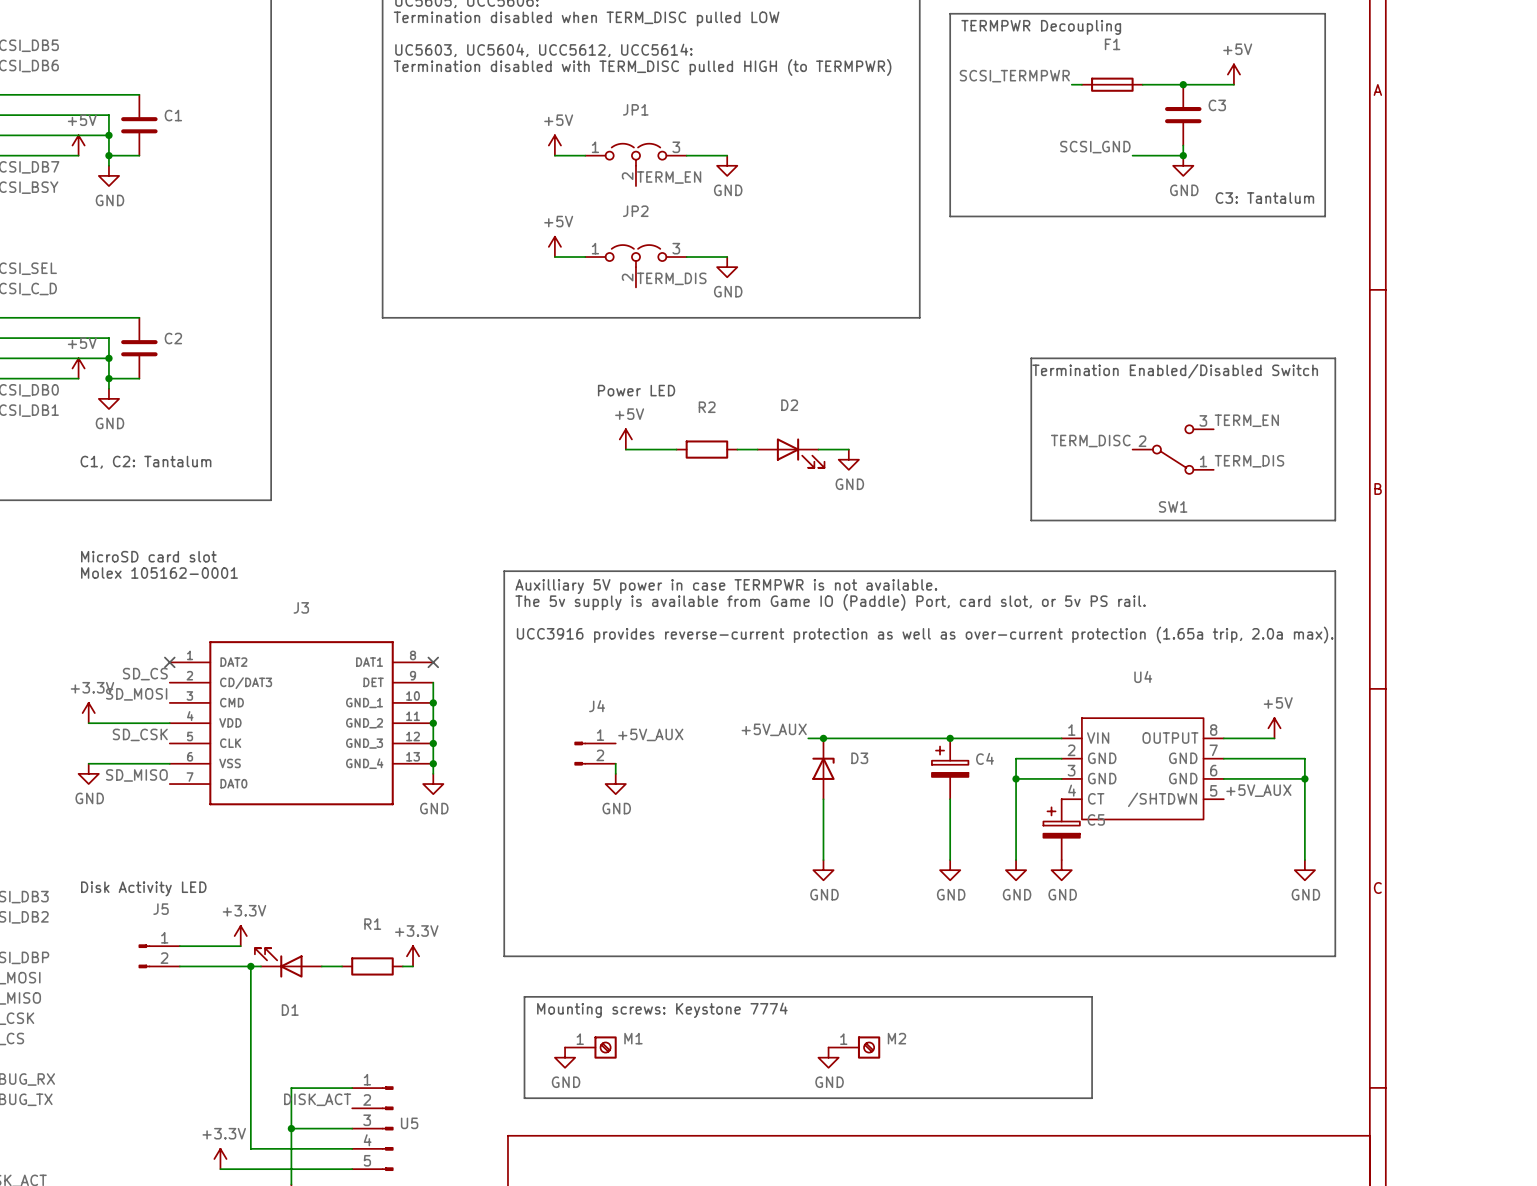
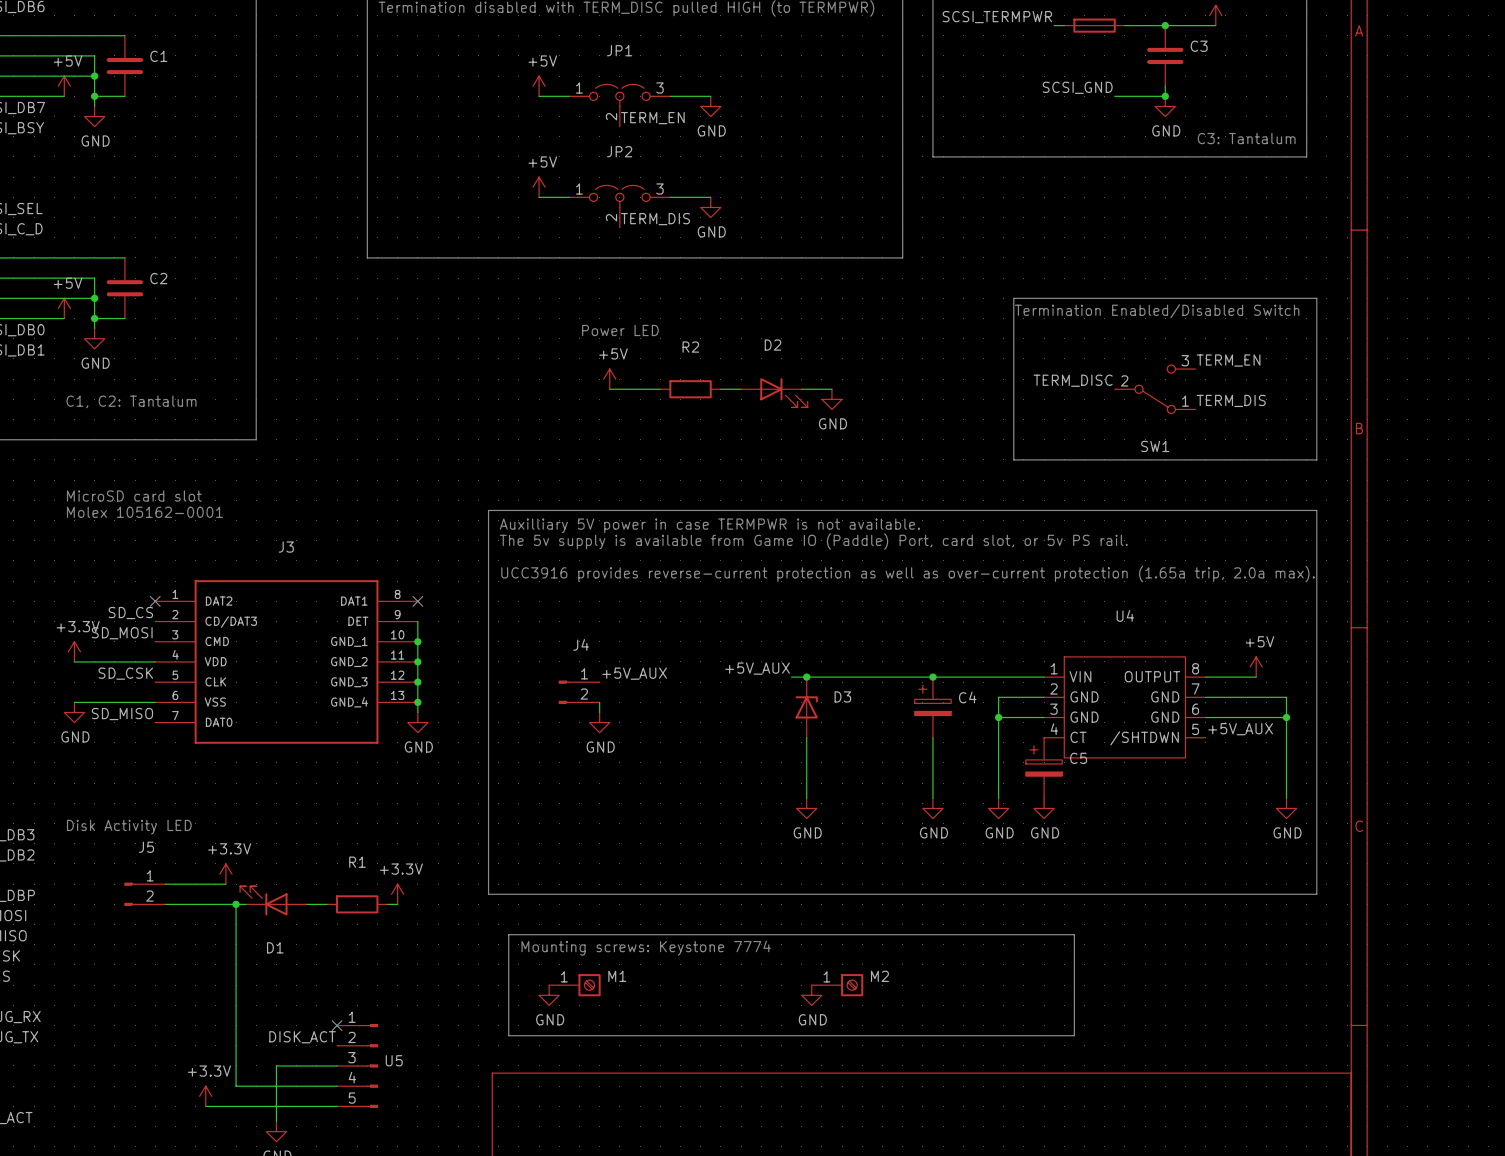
wire: (352, 1088) (291, 1088) (291, 1128) -> none
no-connect mark: none -> (337, 1025)
junction: (291, 1128) -> none

